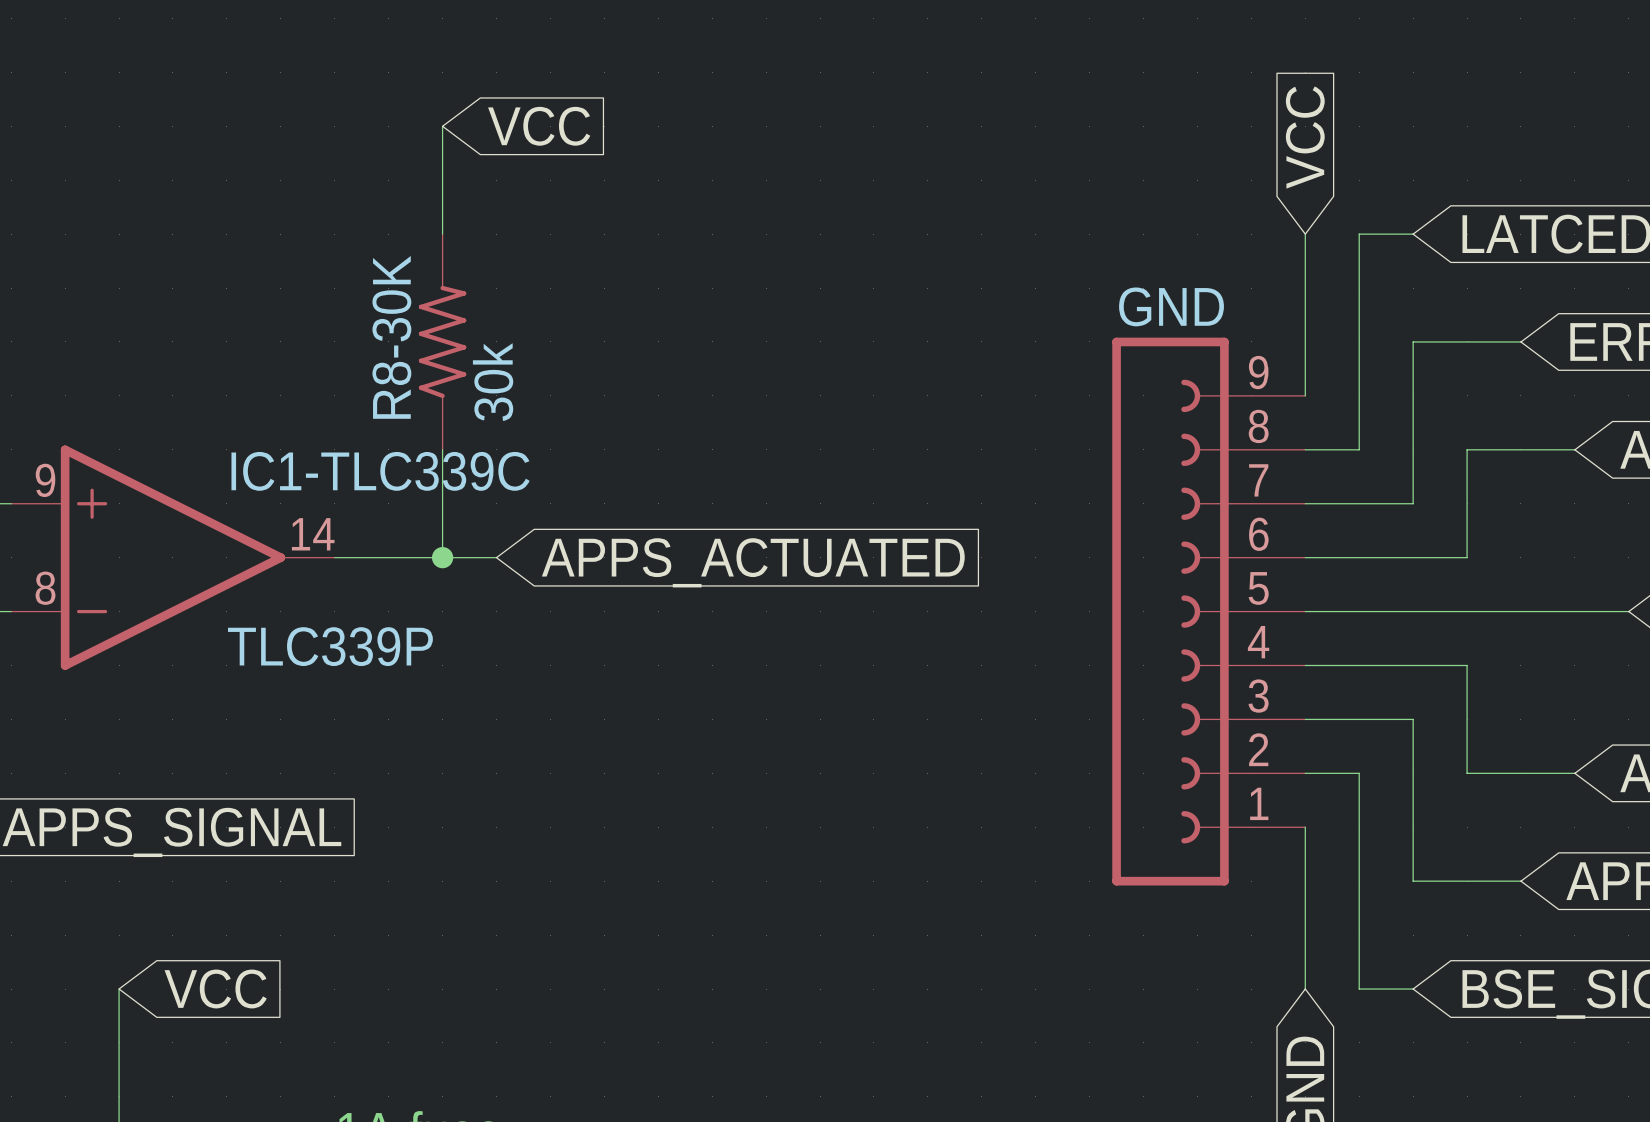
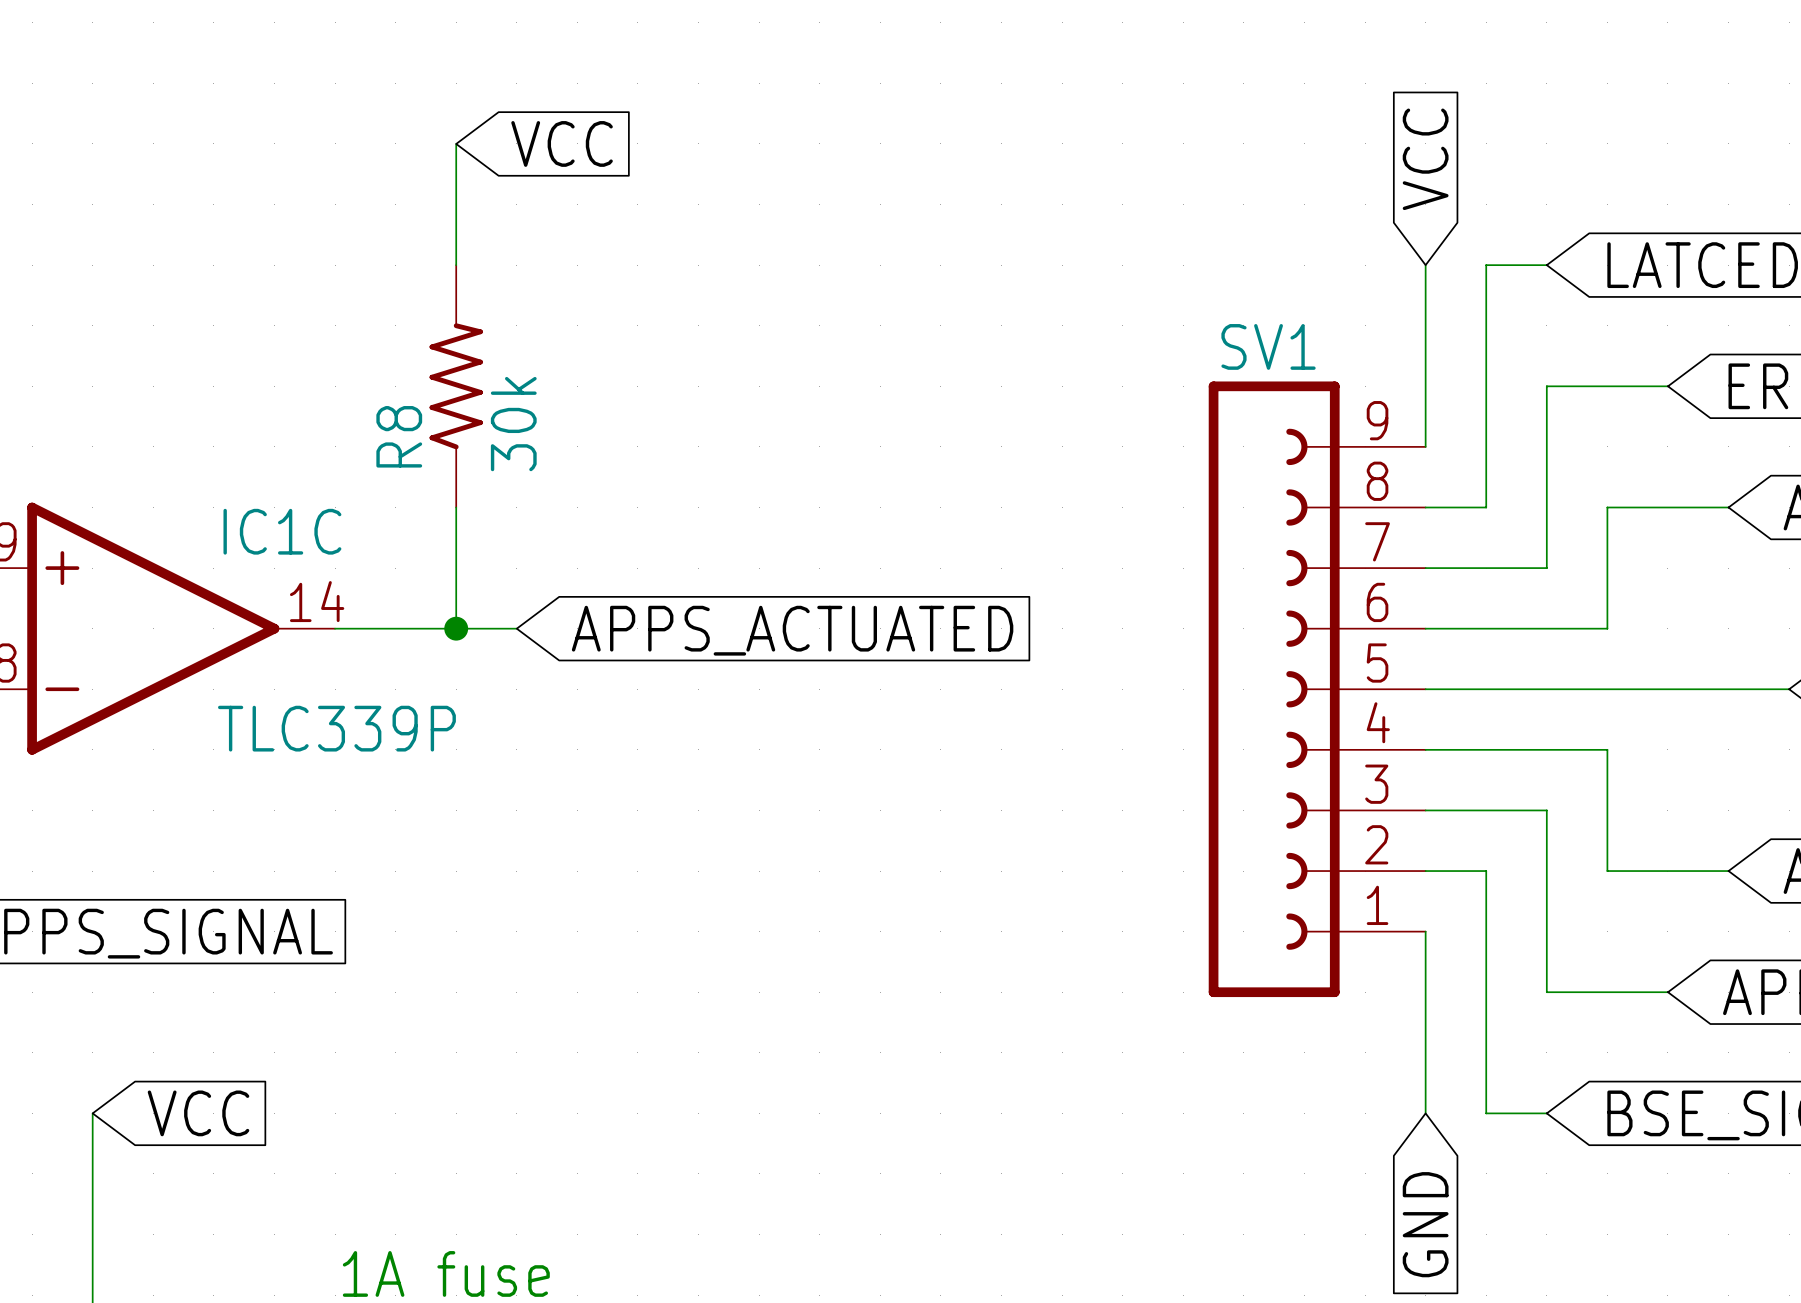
GND name: GND (1171, 306) -> SV1 (1268, 346)
R8-30K name: R8-30K (391, 337) -> R8 (399, 436)
IC1-TLC339C name: IC1-TLC339C (380, 471) -> IC1C (282, 531)

